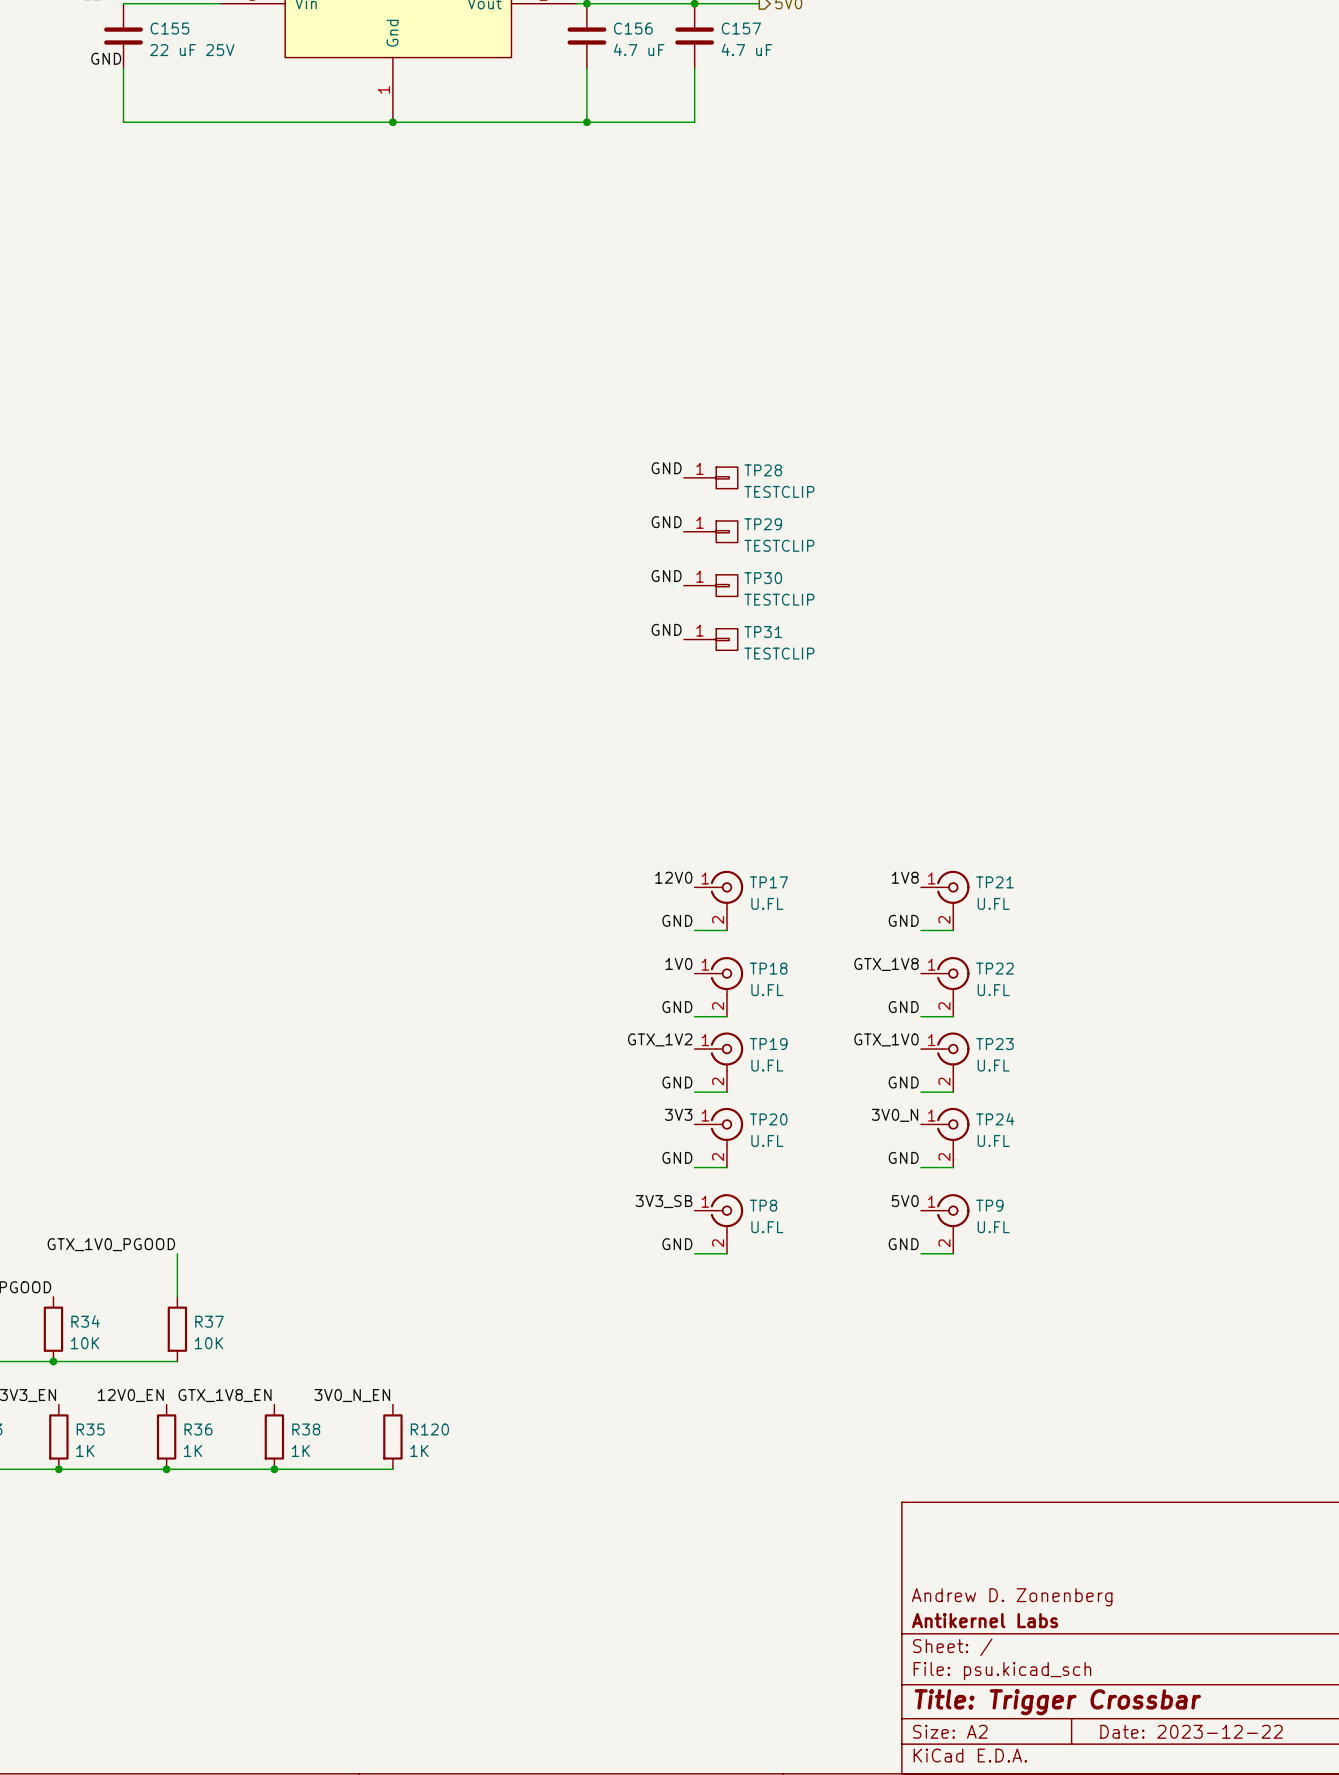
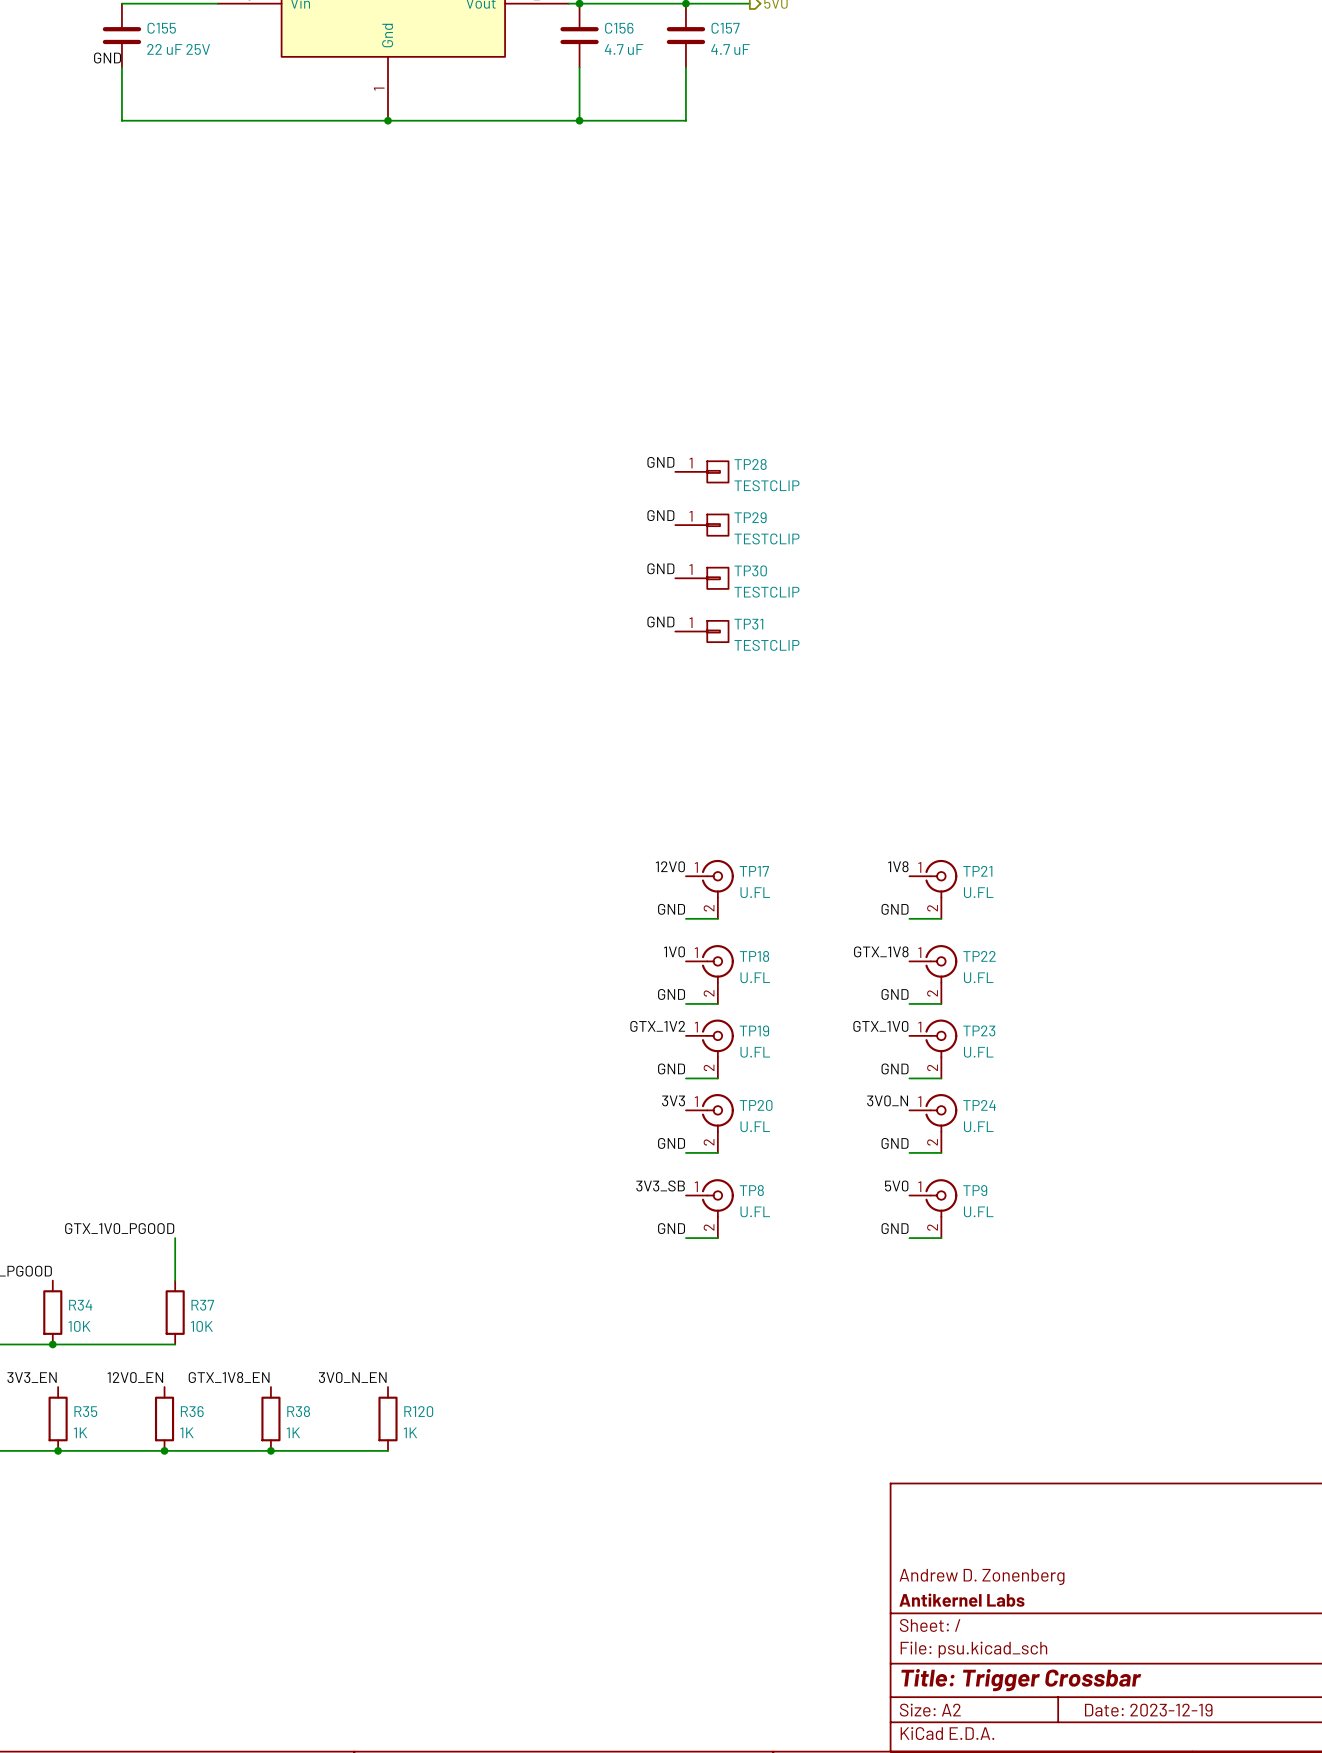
title block: Date: 2023-12-22 (1191, 1731) -> Date: 2023-12-19 (1148, 1710)

